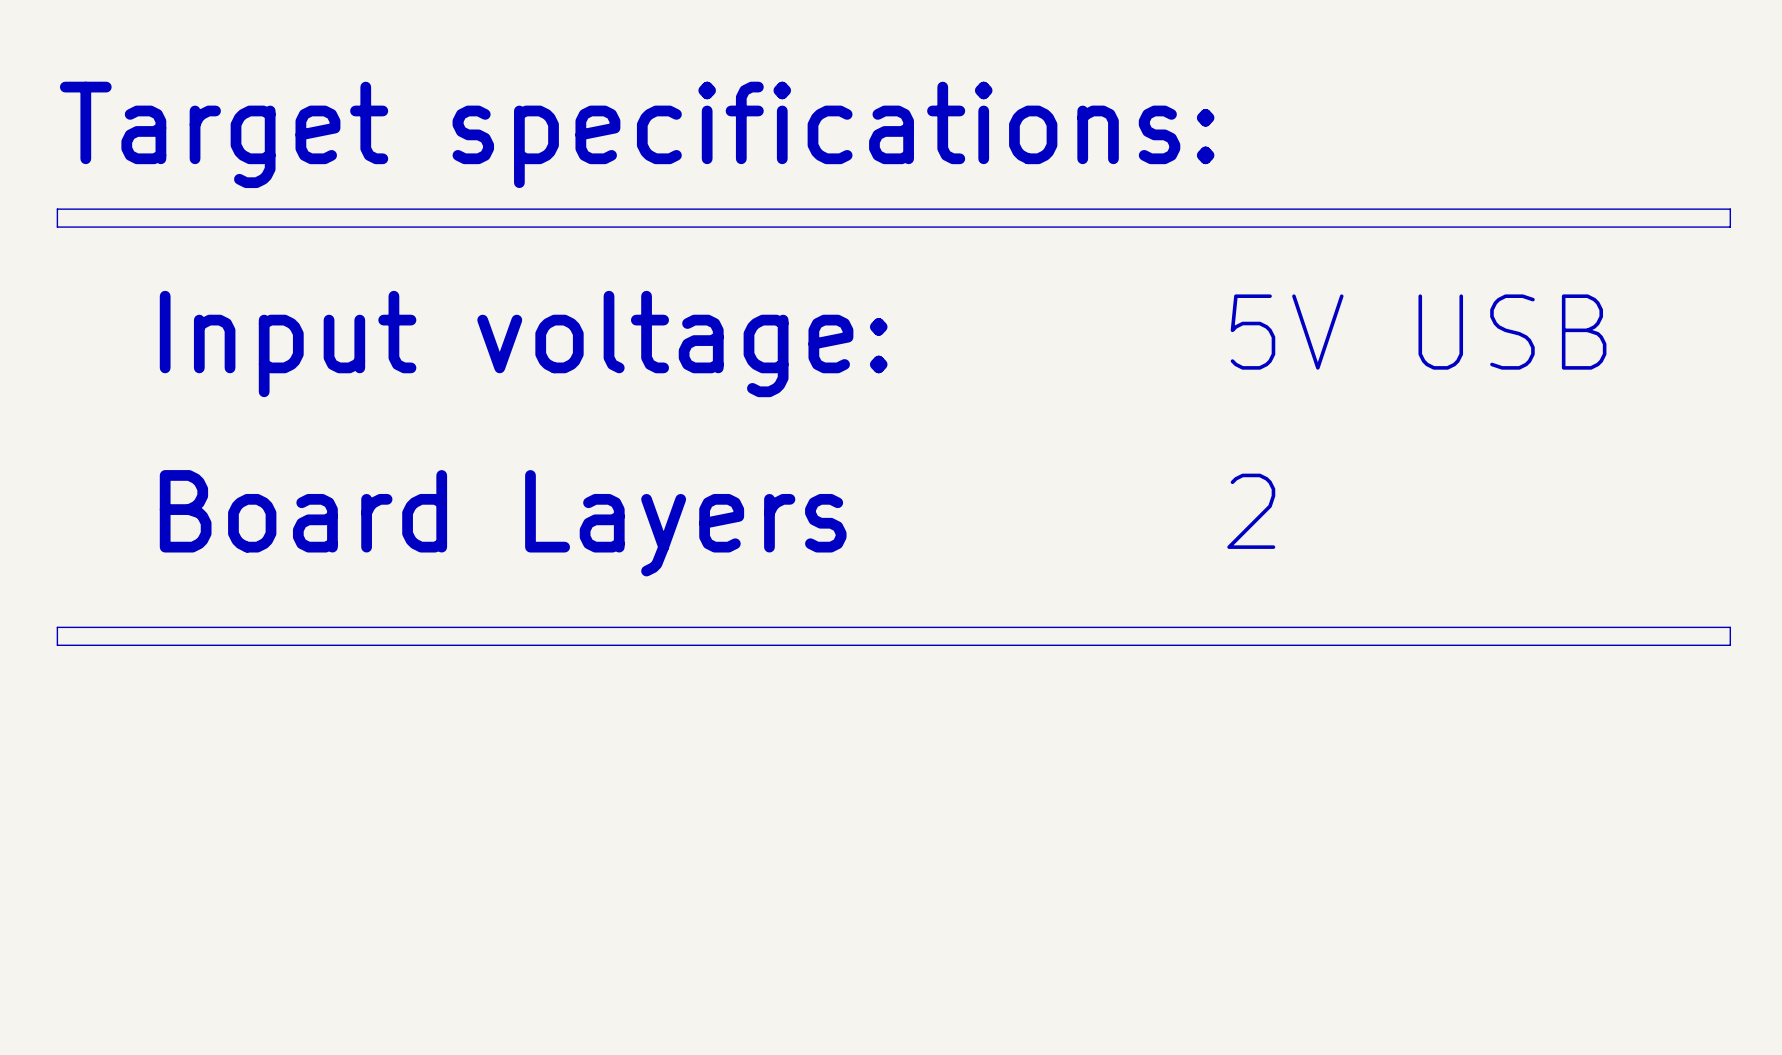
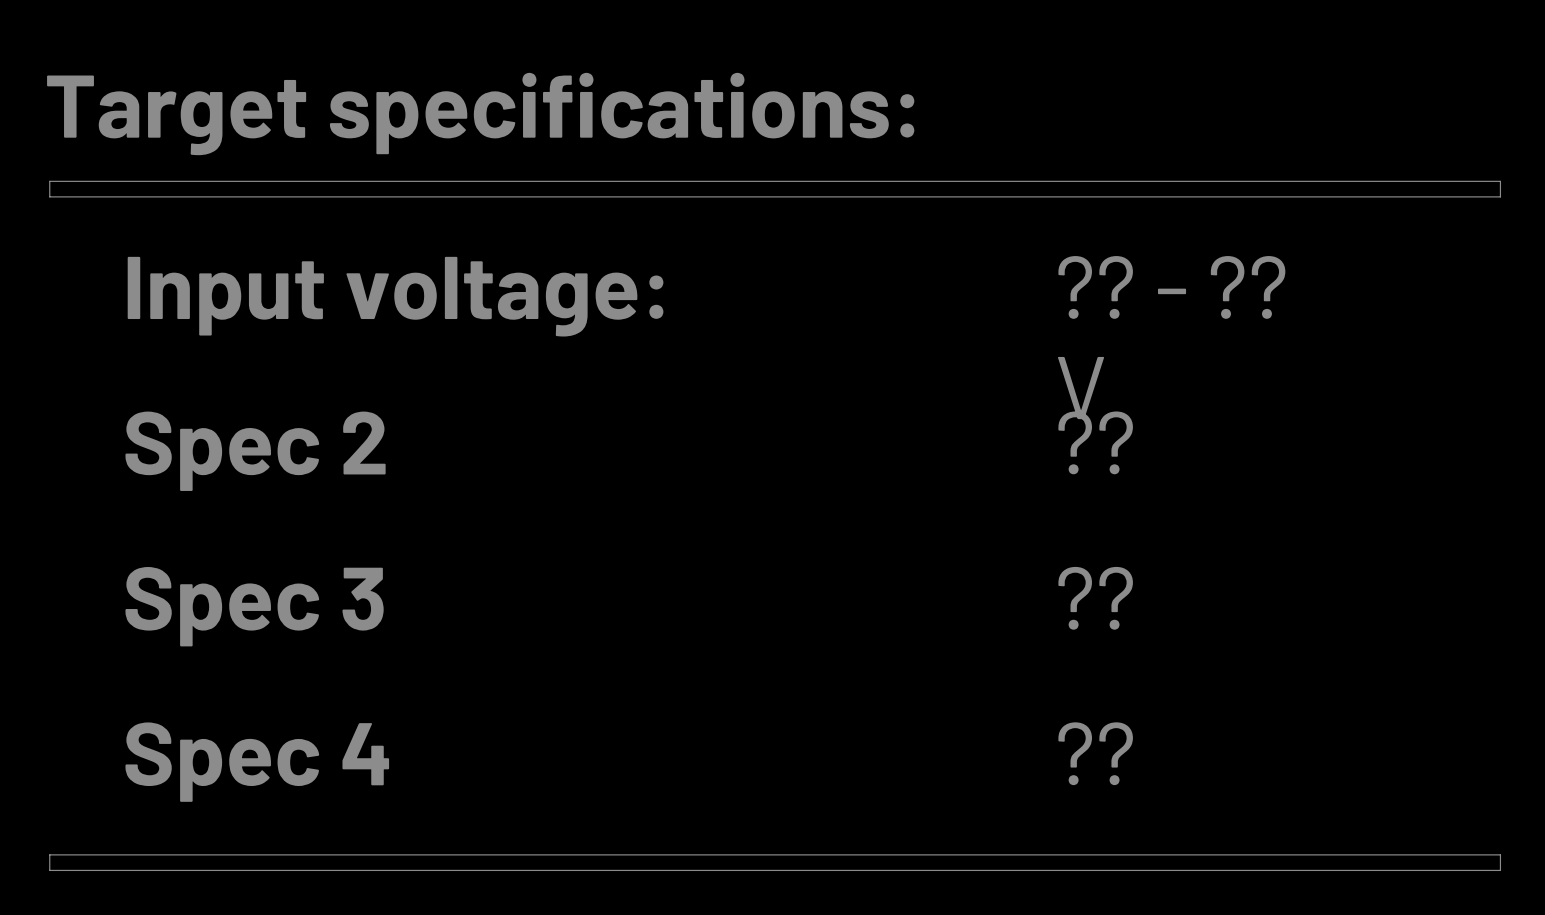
text: 5V USB (1418, 332) -> ?? - ?? (1171, 287)
text: none -> V (1081, 388)
text: 2 (1251, 511) -> ?? (1095, 442)
text: Board Layers (503, 523) -> Spec 2 (255, 451)
line: (57, 627) (1730, 627) (1730, 645) (57, 645) (57, 627) -> (49, 854) (1500, 854) (1500, 870) (49, 870) (49, 854)
text: none -> ?? (1095, 598)
text: none -> Spec 3 (254, 606)
text: none -> ?? (1095, 753)
text: none -> Spec 4 (257, 762)

